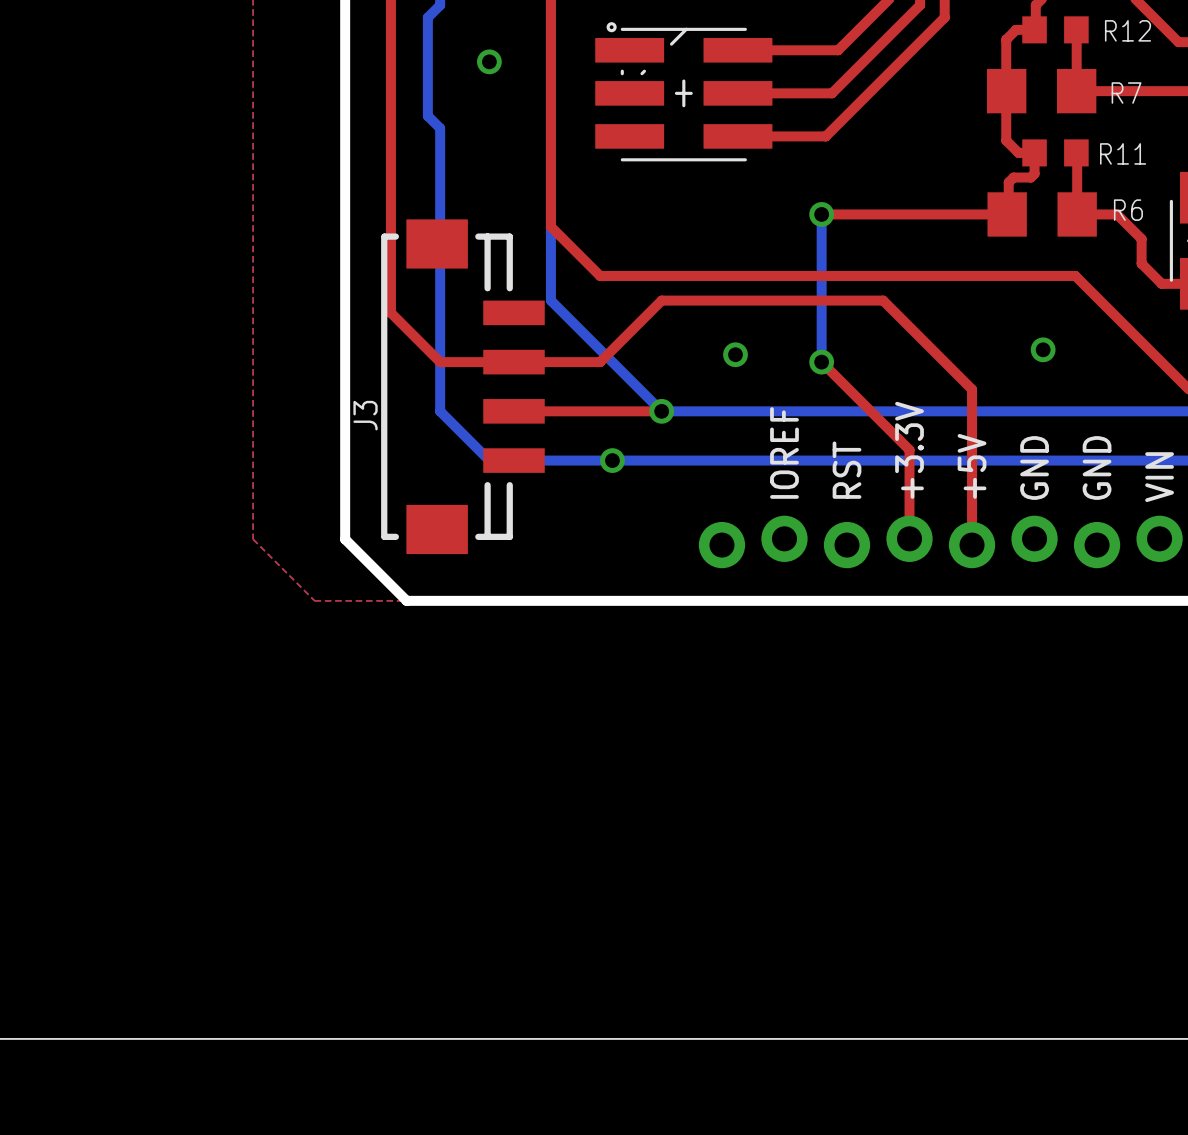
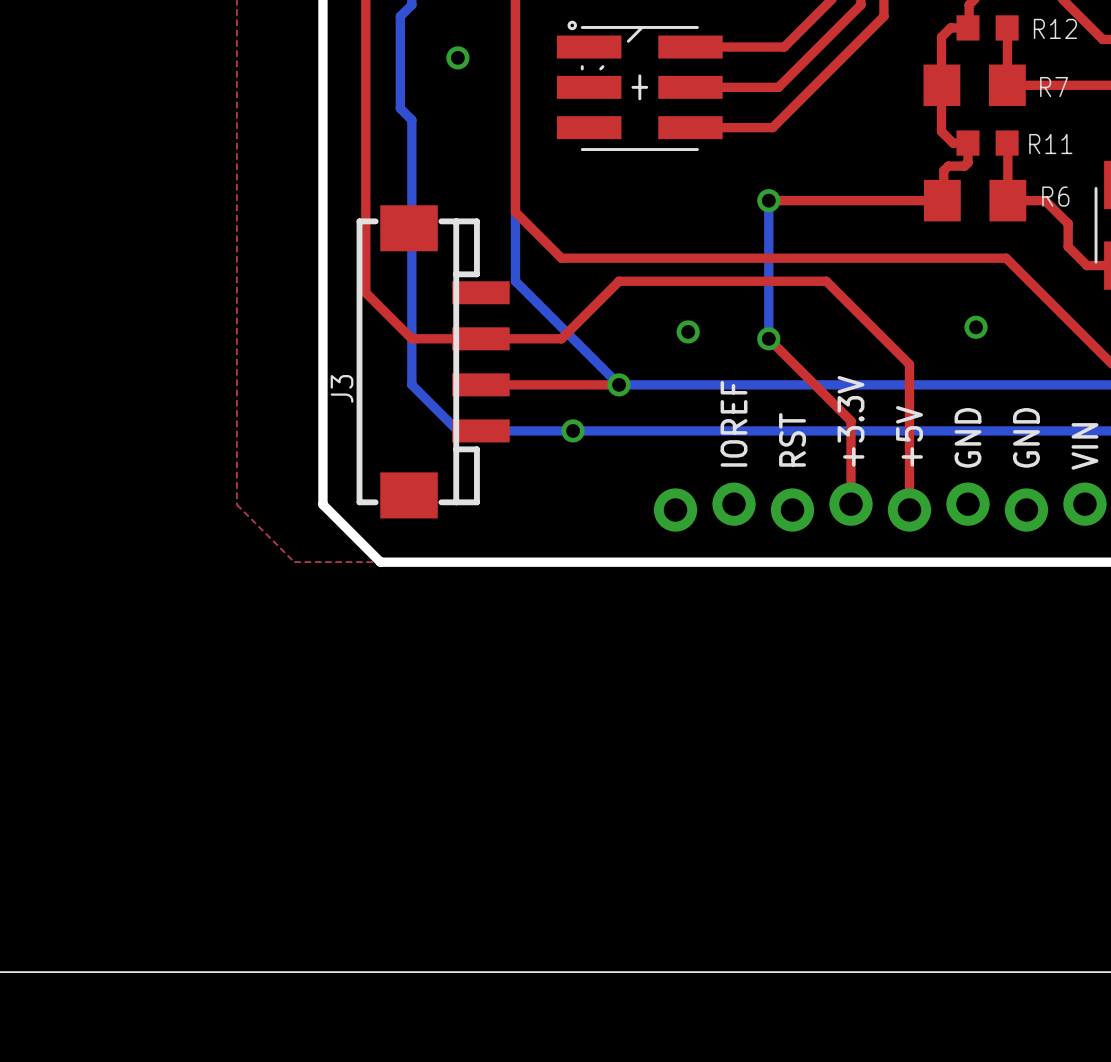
J3 footprint: [381, 219, 545, 555] -> [356, 205, 510, 519]

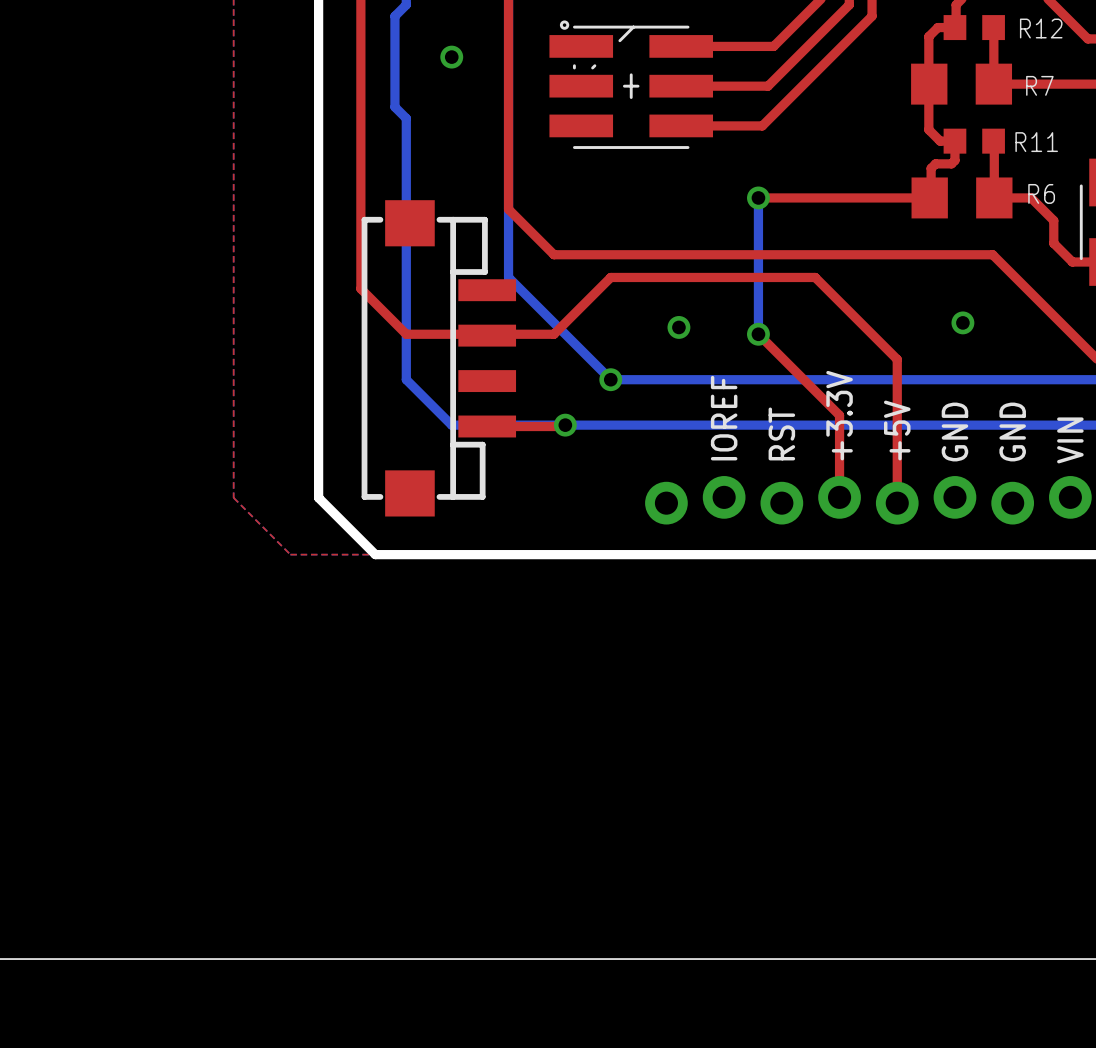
J3: (433, 361) -> none
part: none -> (438, 358)
top track: (480, 384) (619, 384) -> none
top track: none -> (487, 426) (563, 426)

